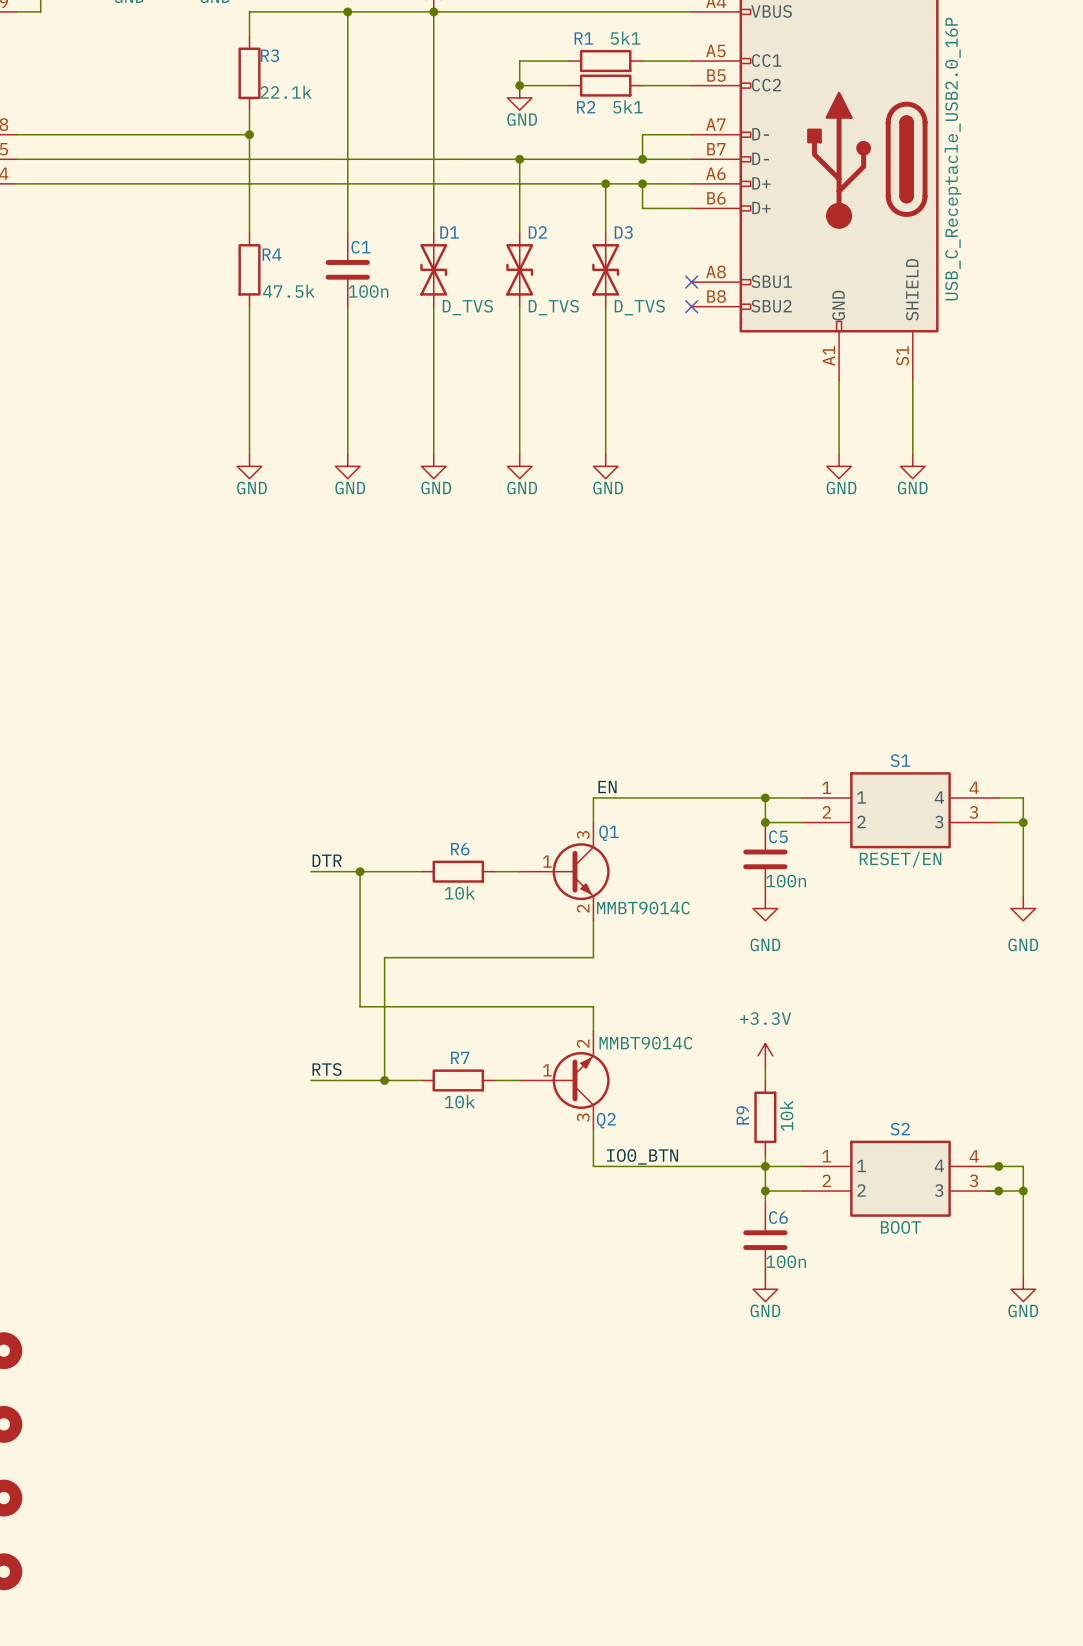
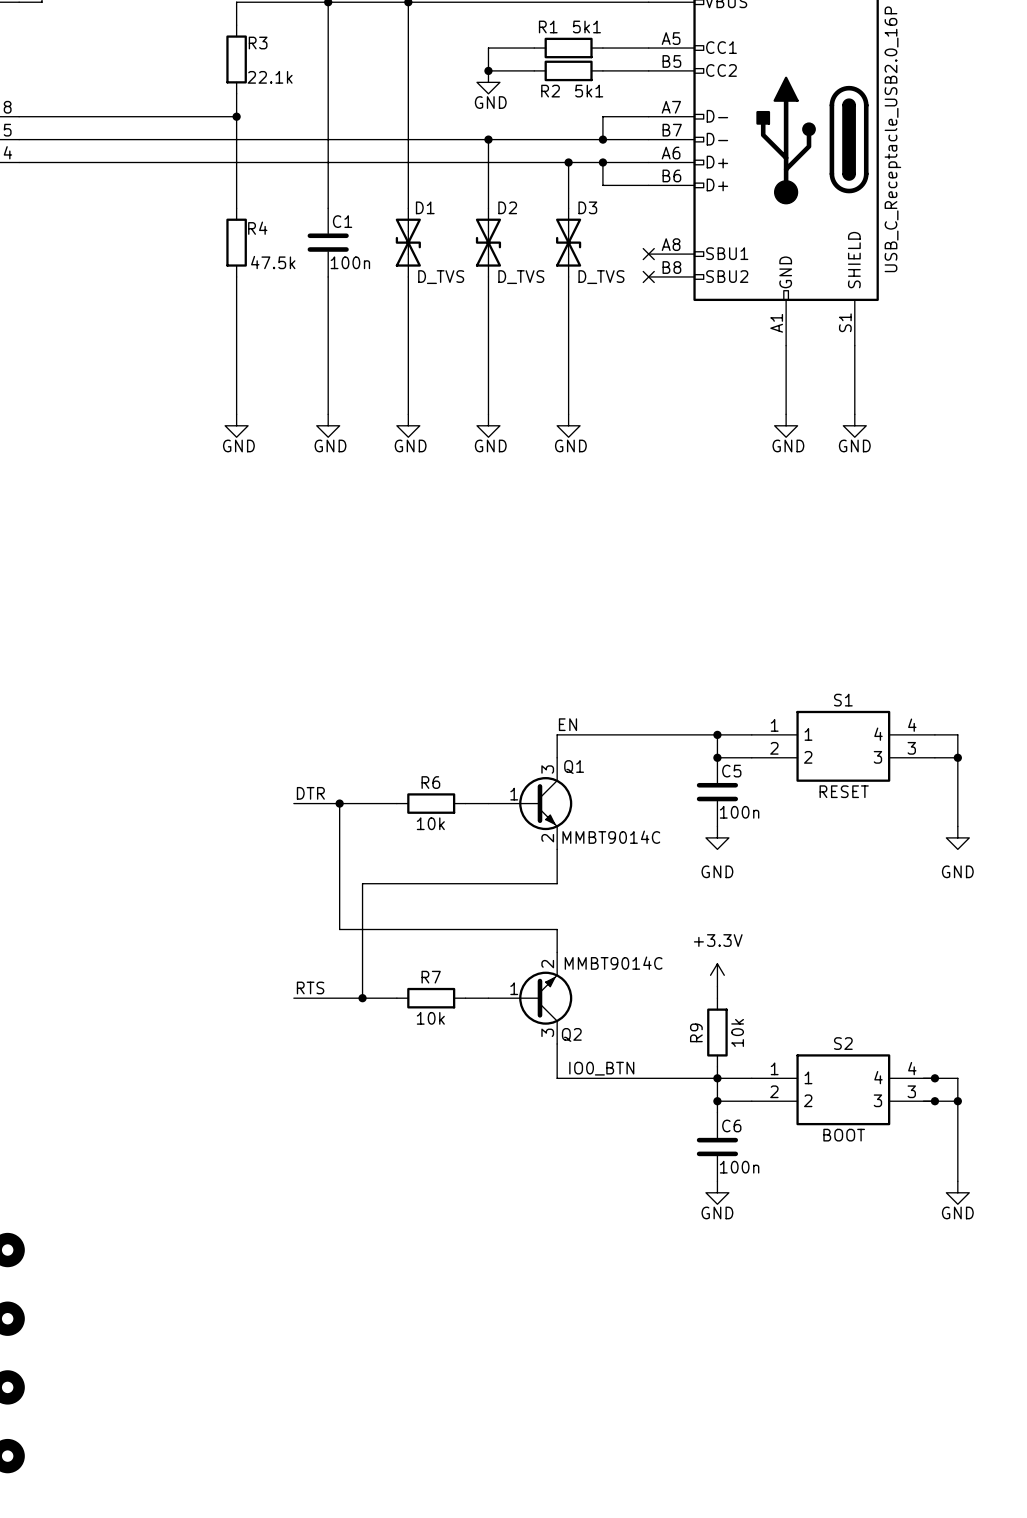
S1 value: RESET/EN (900, 859) -> RESET (844, 791)

